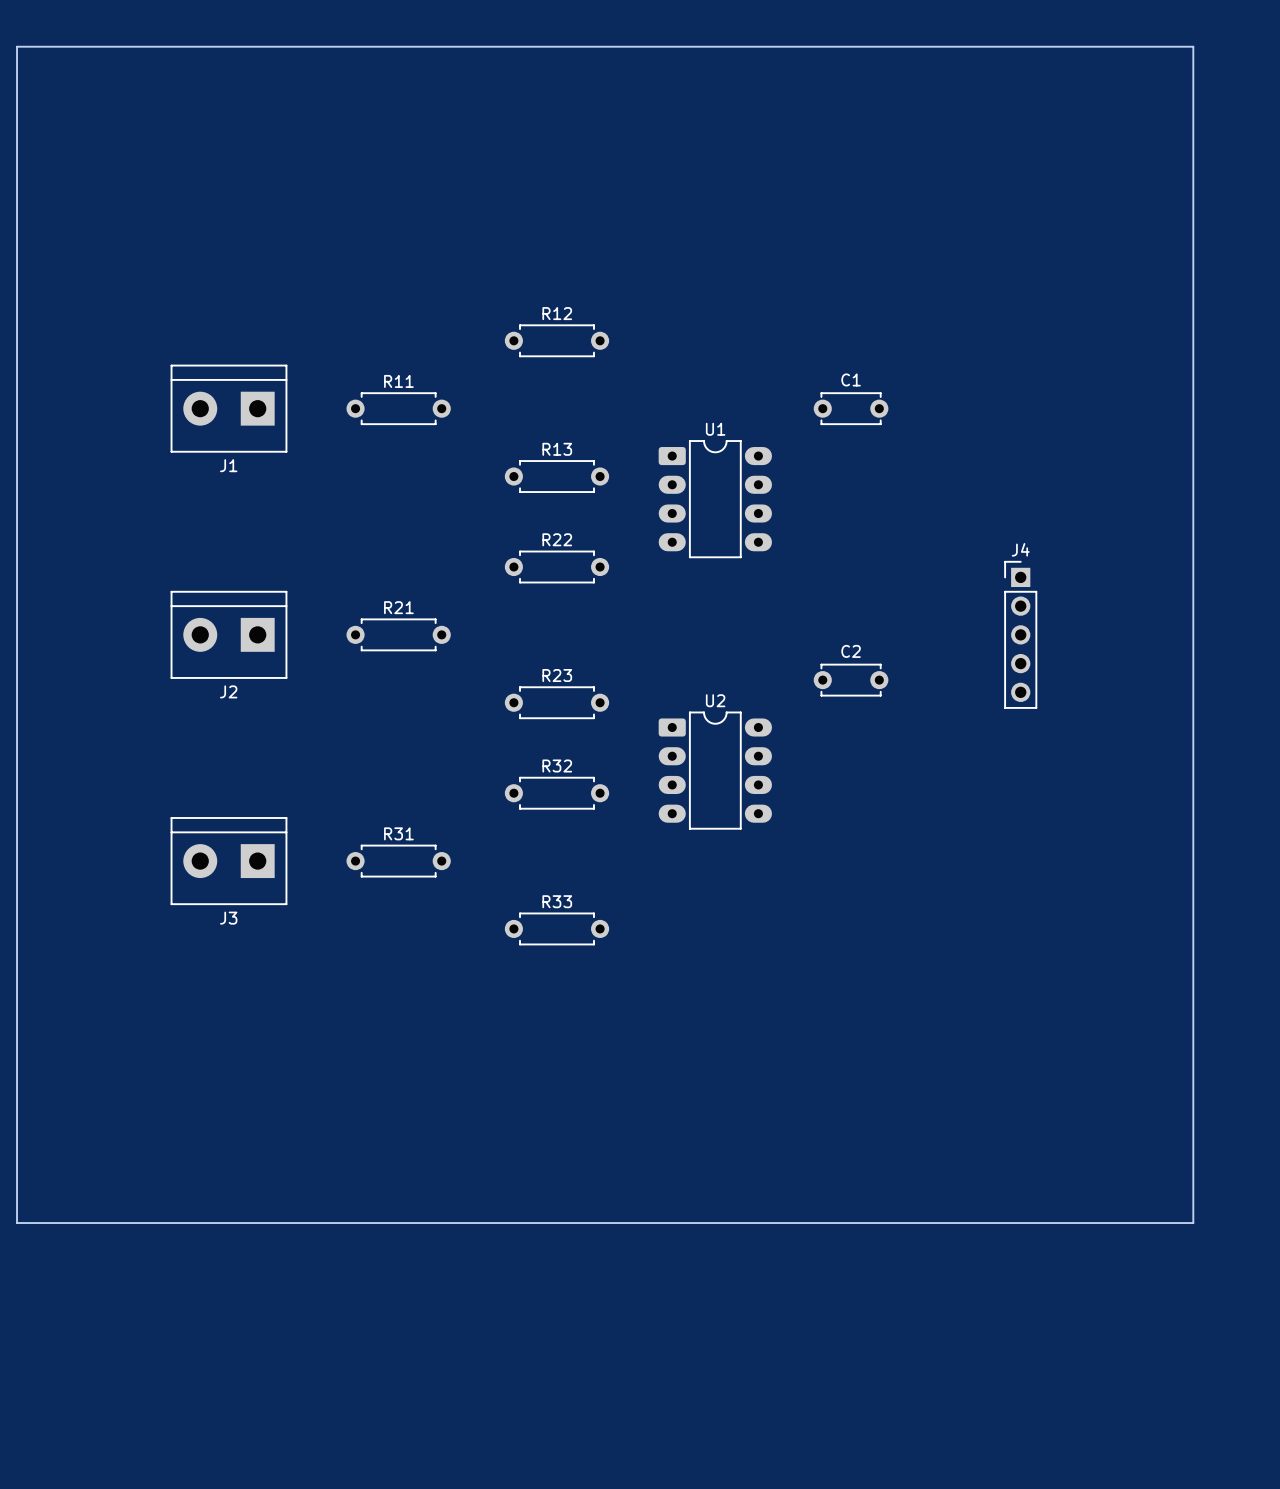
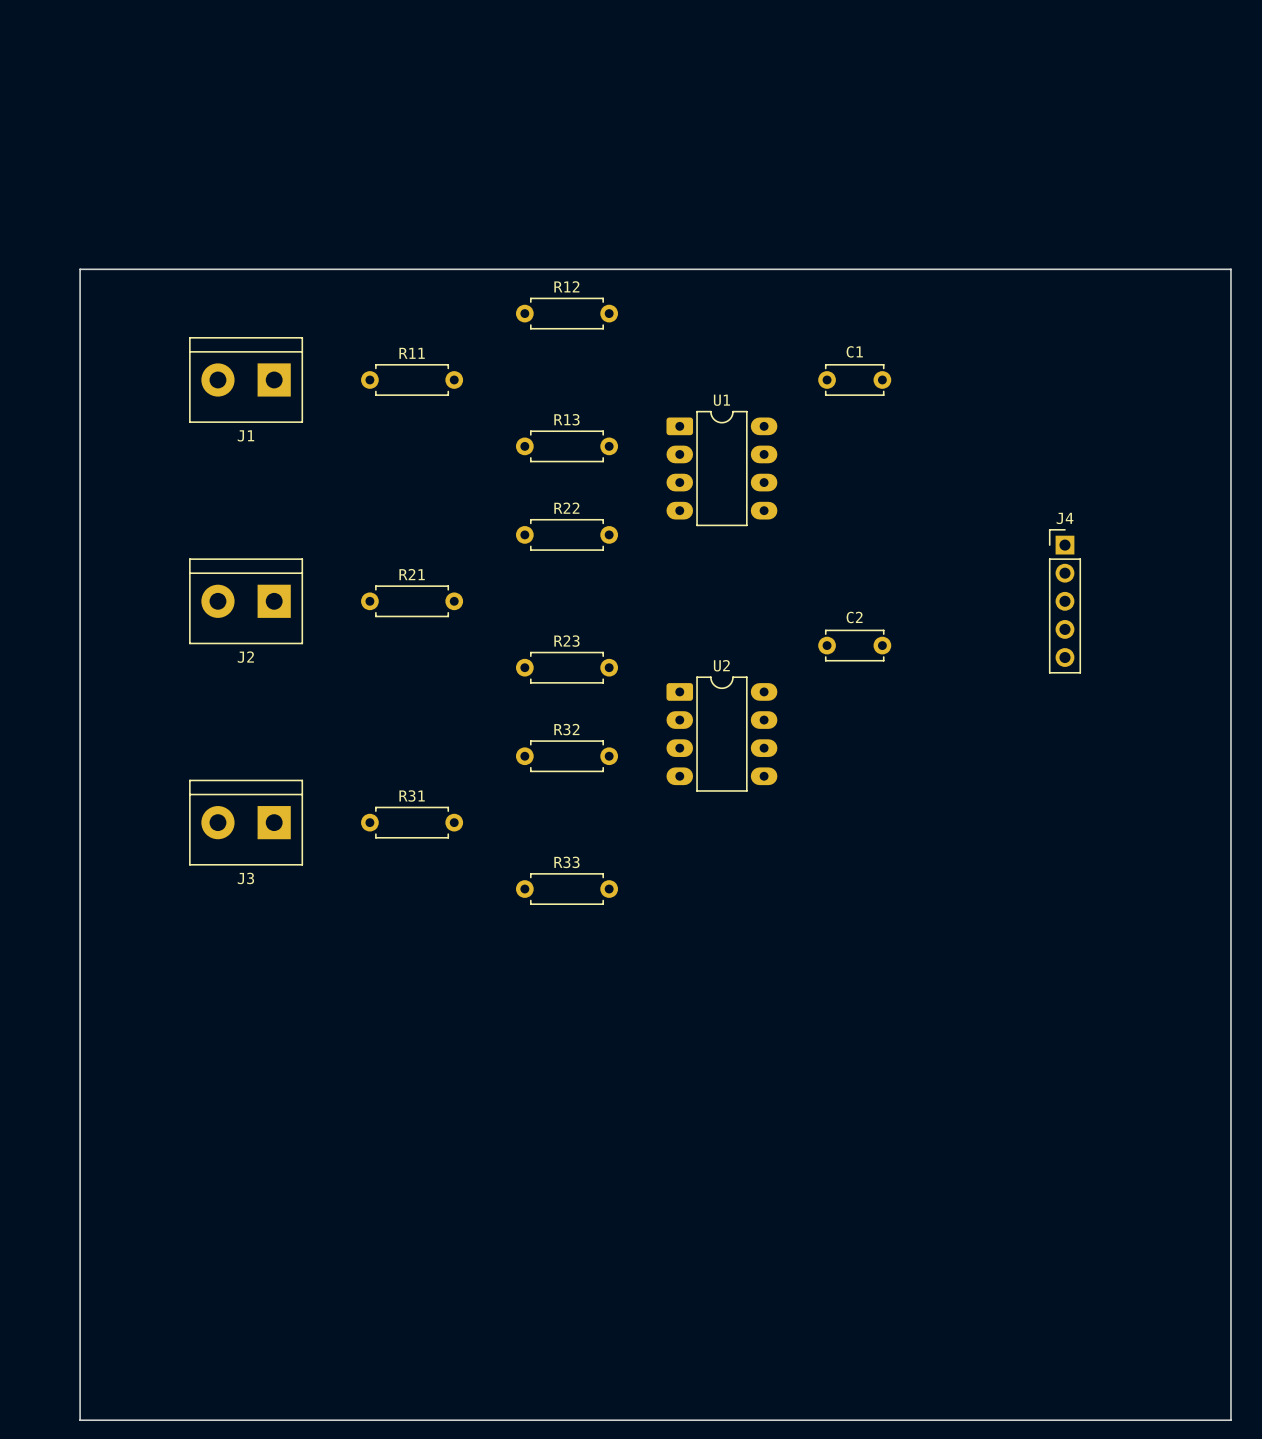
board edge: (17, 46) (1193, 46) (1193, 1223) (17, 1223) (17, 46) -> (80, 269) (1230, 269) (1230, 1420) (80, 1420) (80, 269)
J4 position: (1020, 634) -> (1064, 601)

